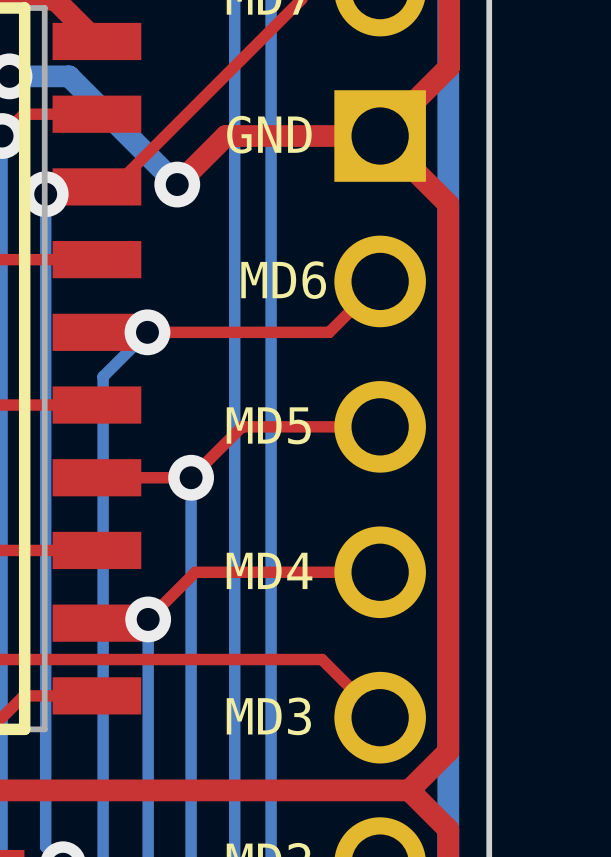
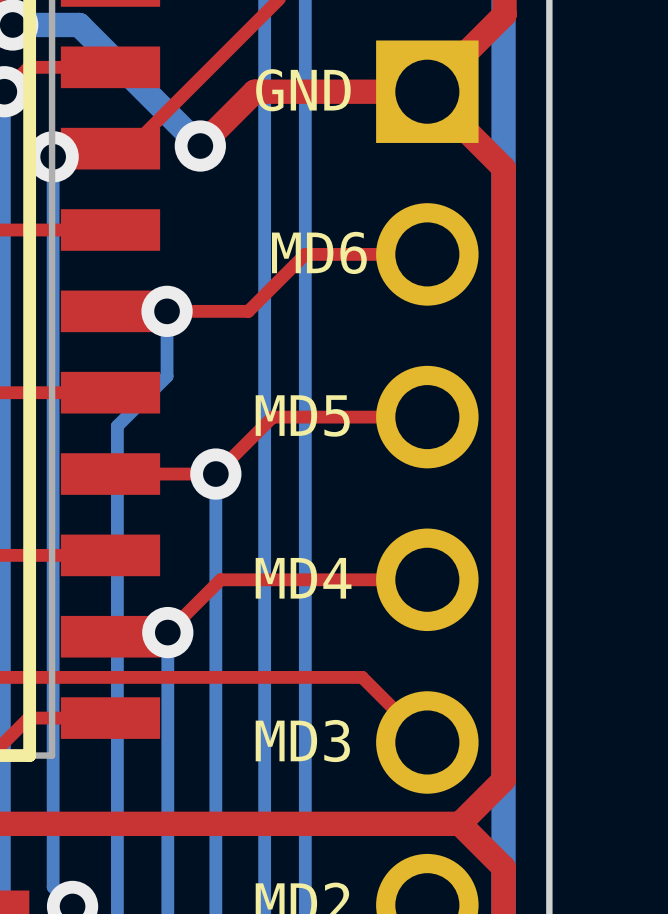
top track: (380, 281) (329, 332) (220, 332) -> (427, 254) (305, 254) (248, 311)
bottom track: (147, 332) (103, 376) (103, 434) -> (167, 311) (167, 376) (117, 426)

